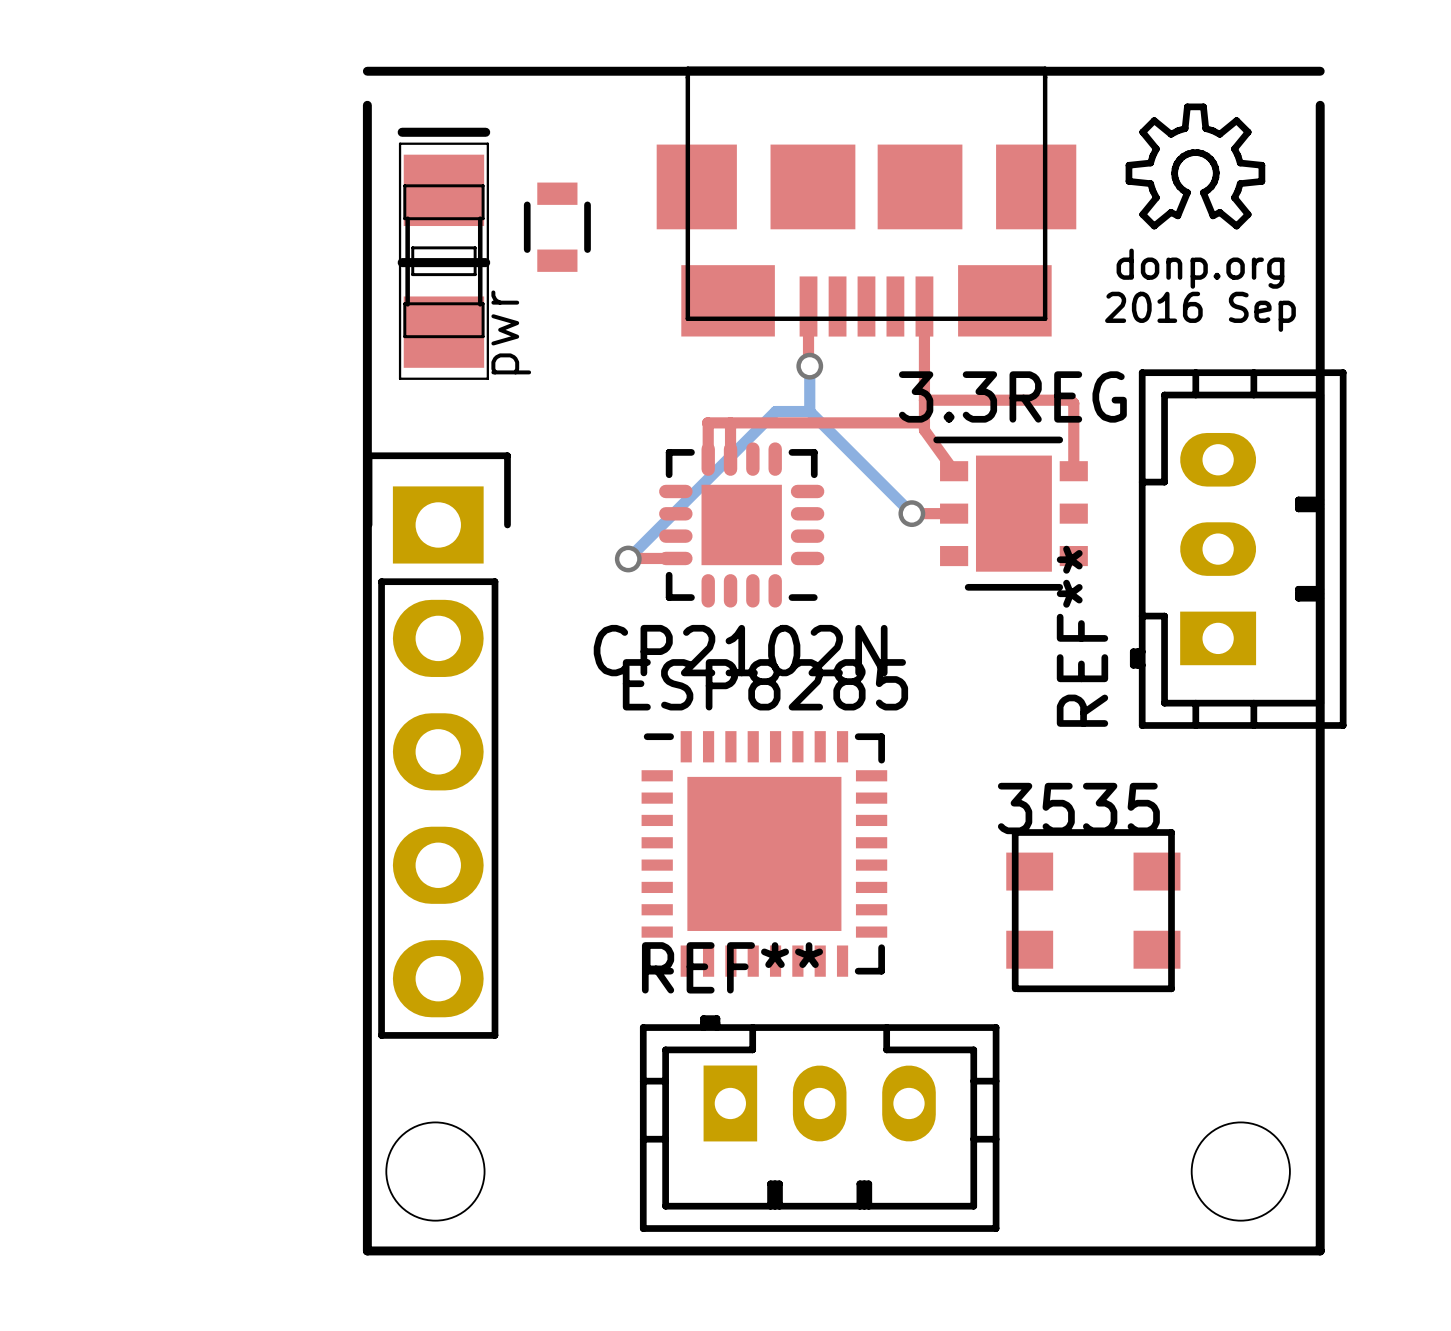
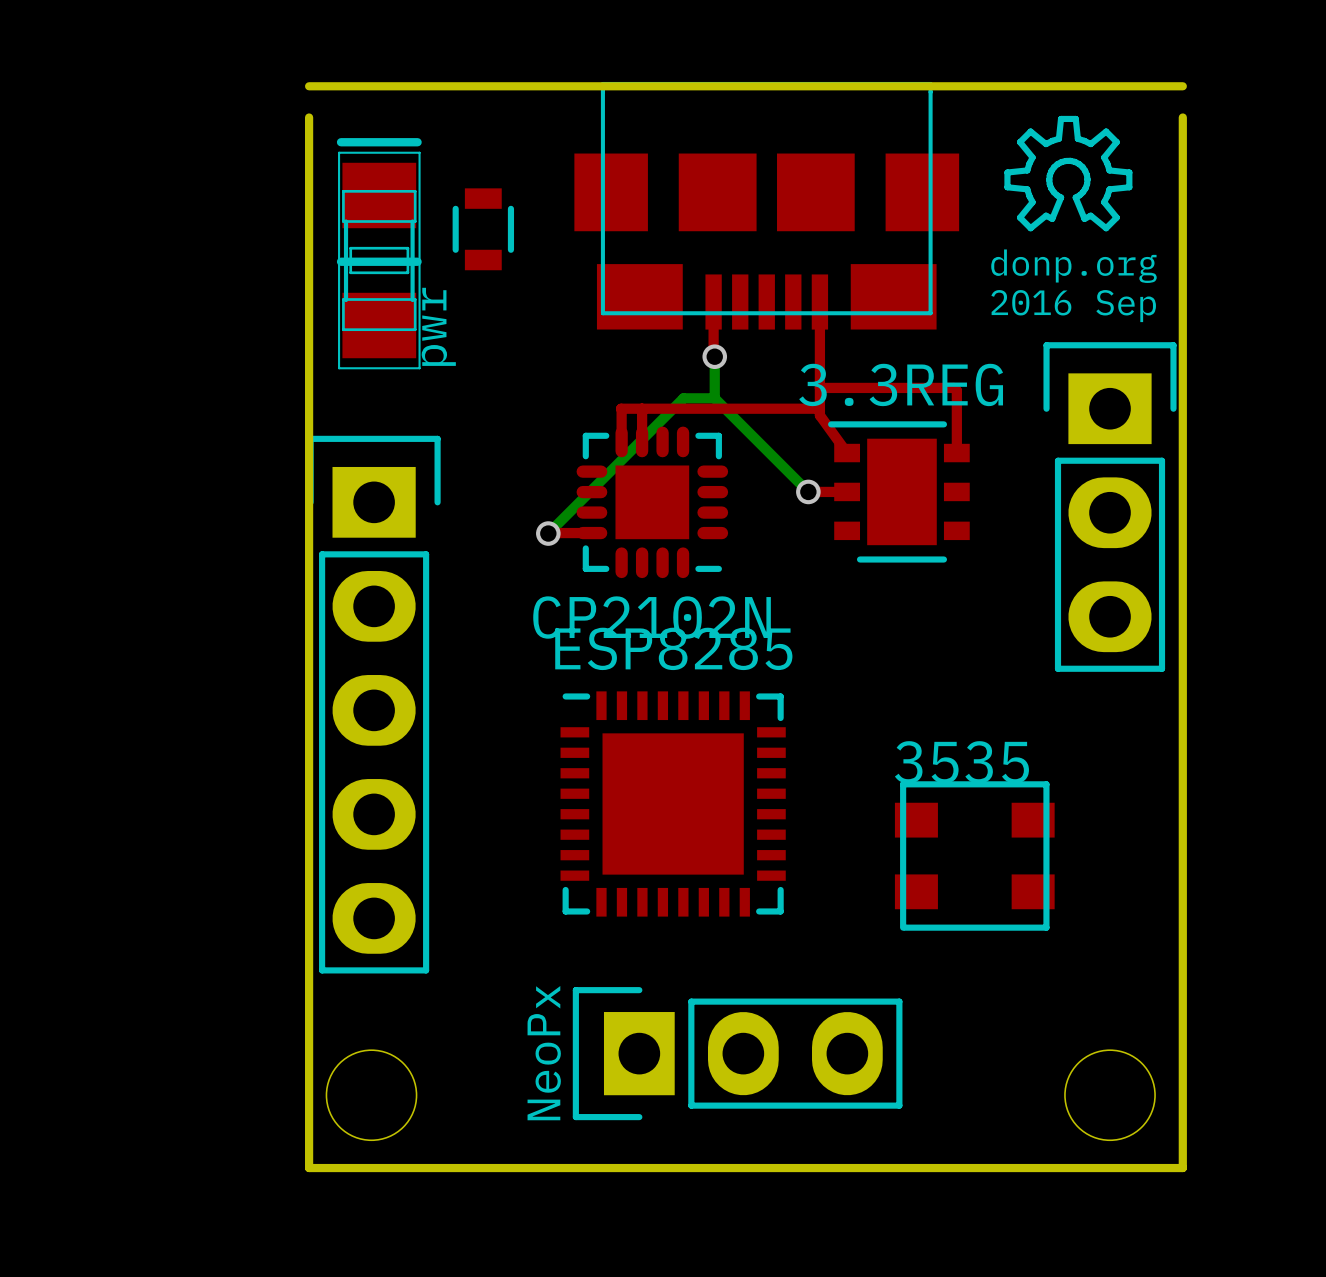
part: none -> (1110, 507)
REF**: (1238, 549) -> none
REF**: (819, 1123) -> none
NeoPx: none -> (737, 1053)

